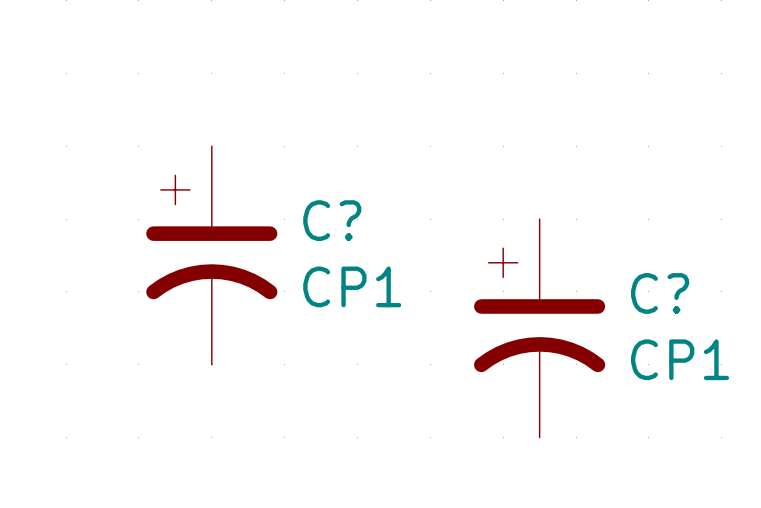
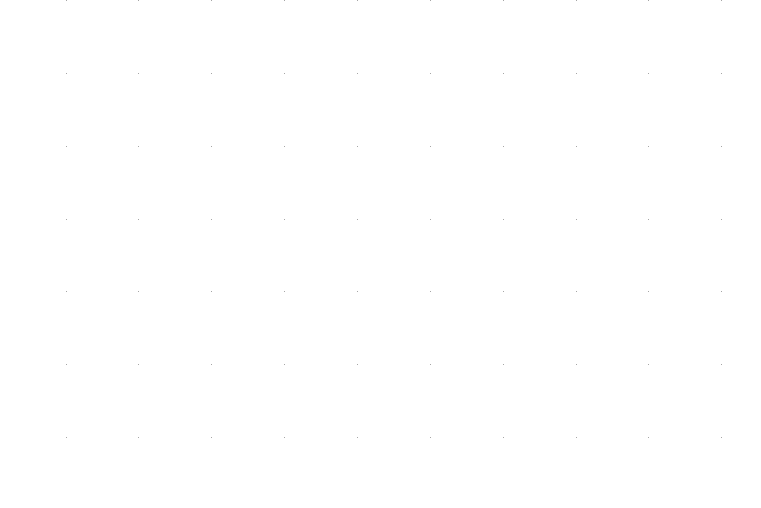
C?: CP1 (211, 255) -> none
C?: CP1 (539, 328) -> none

